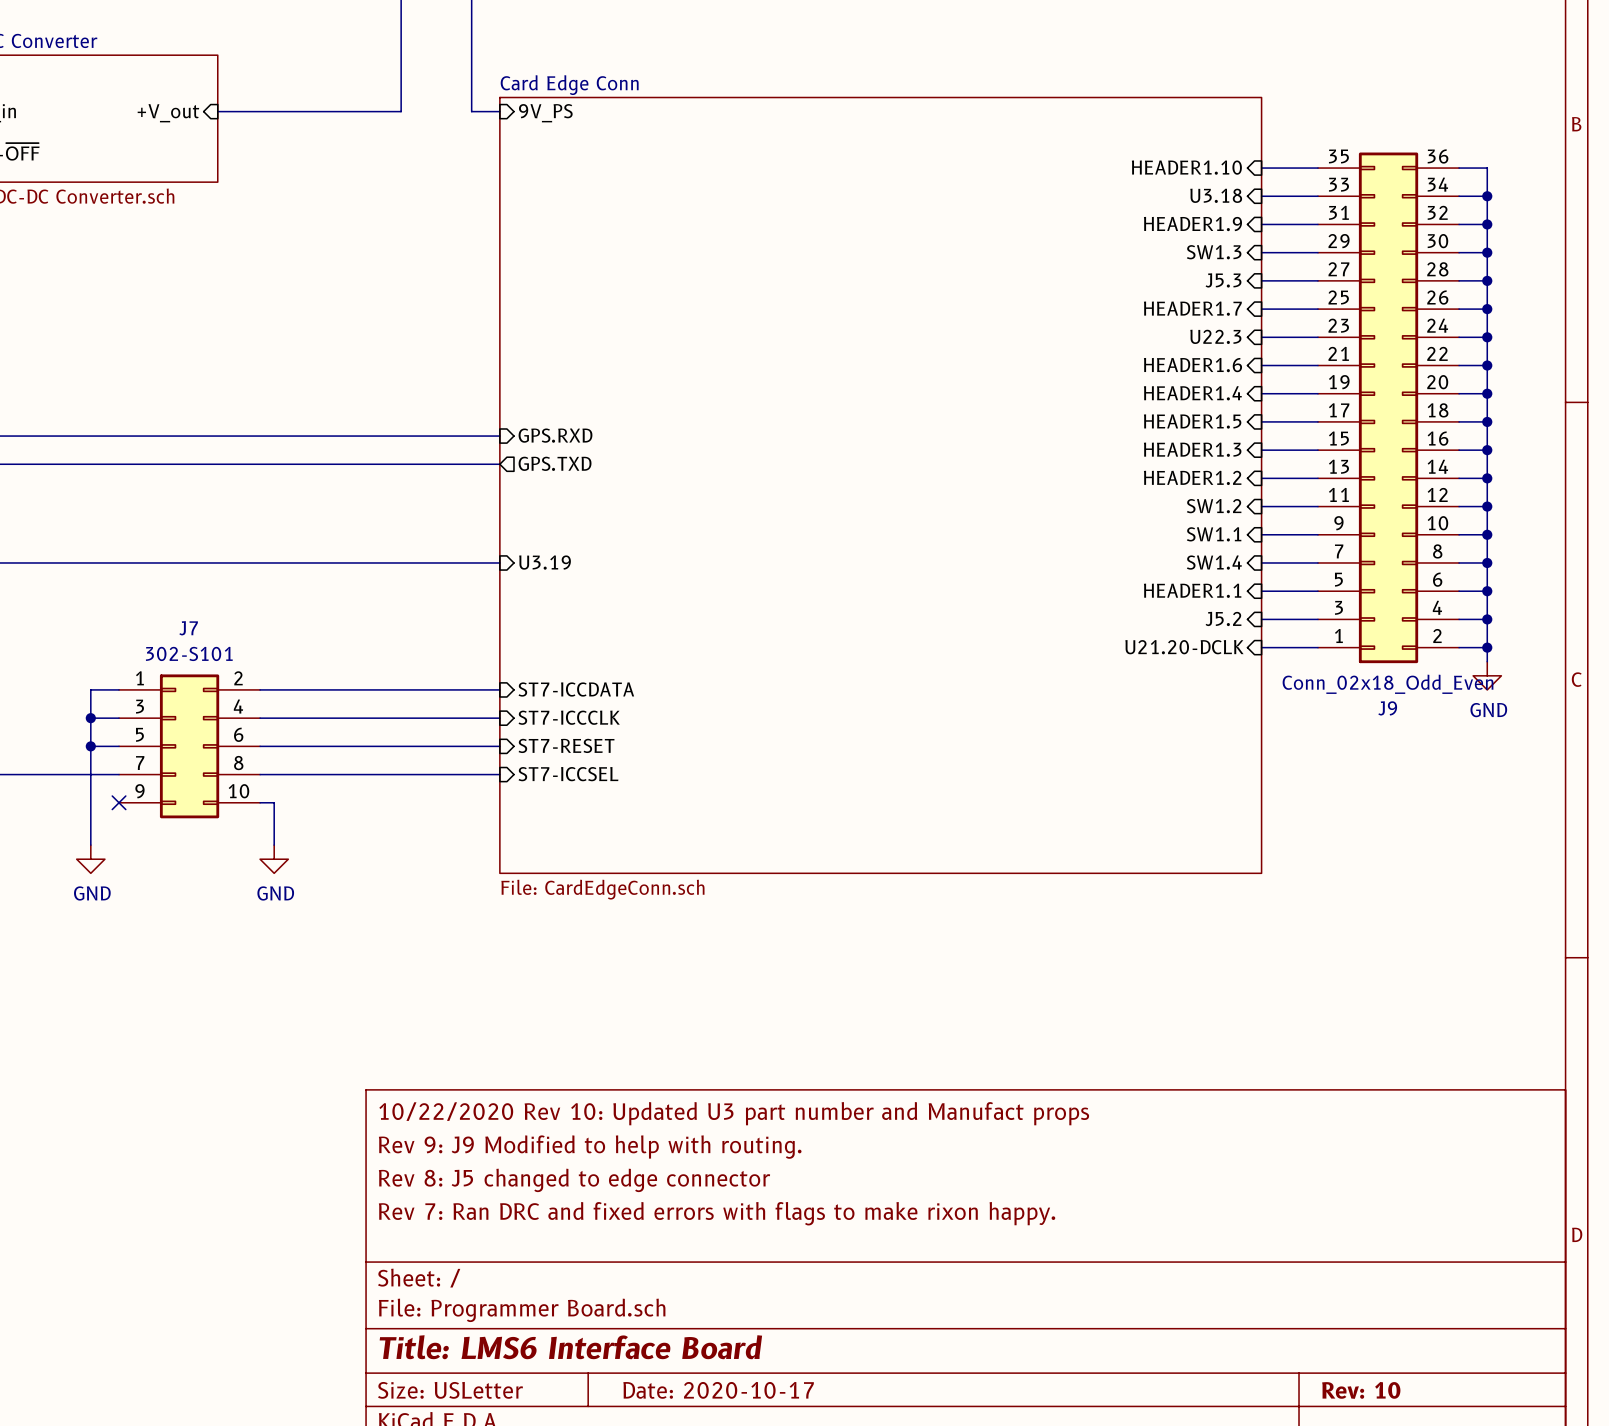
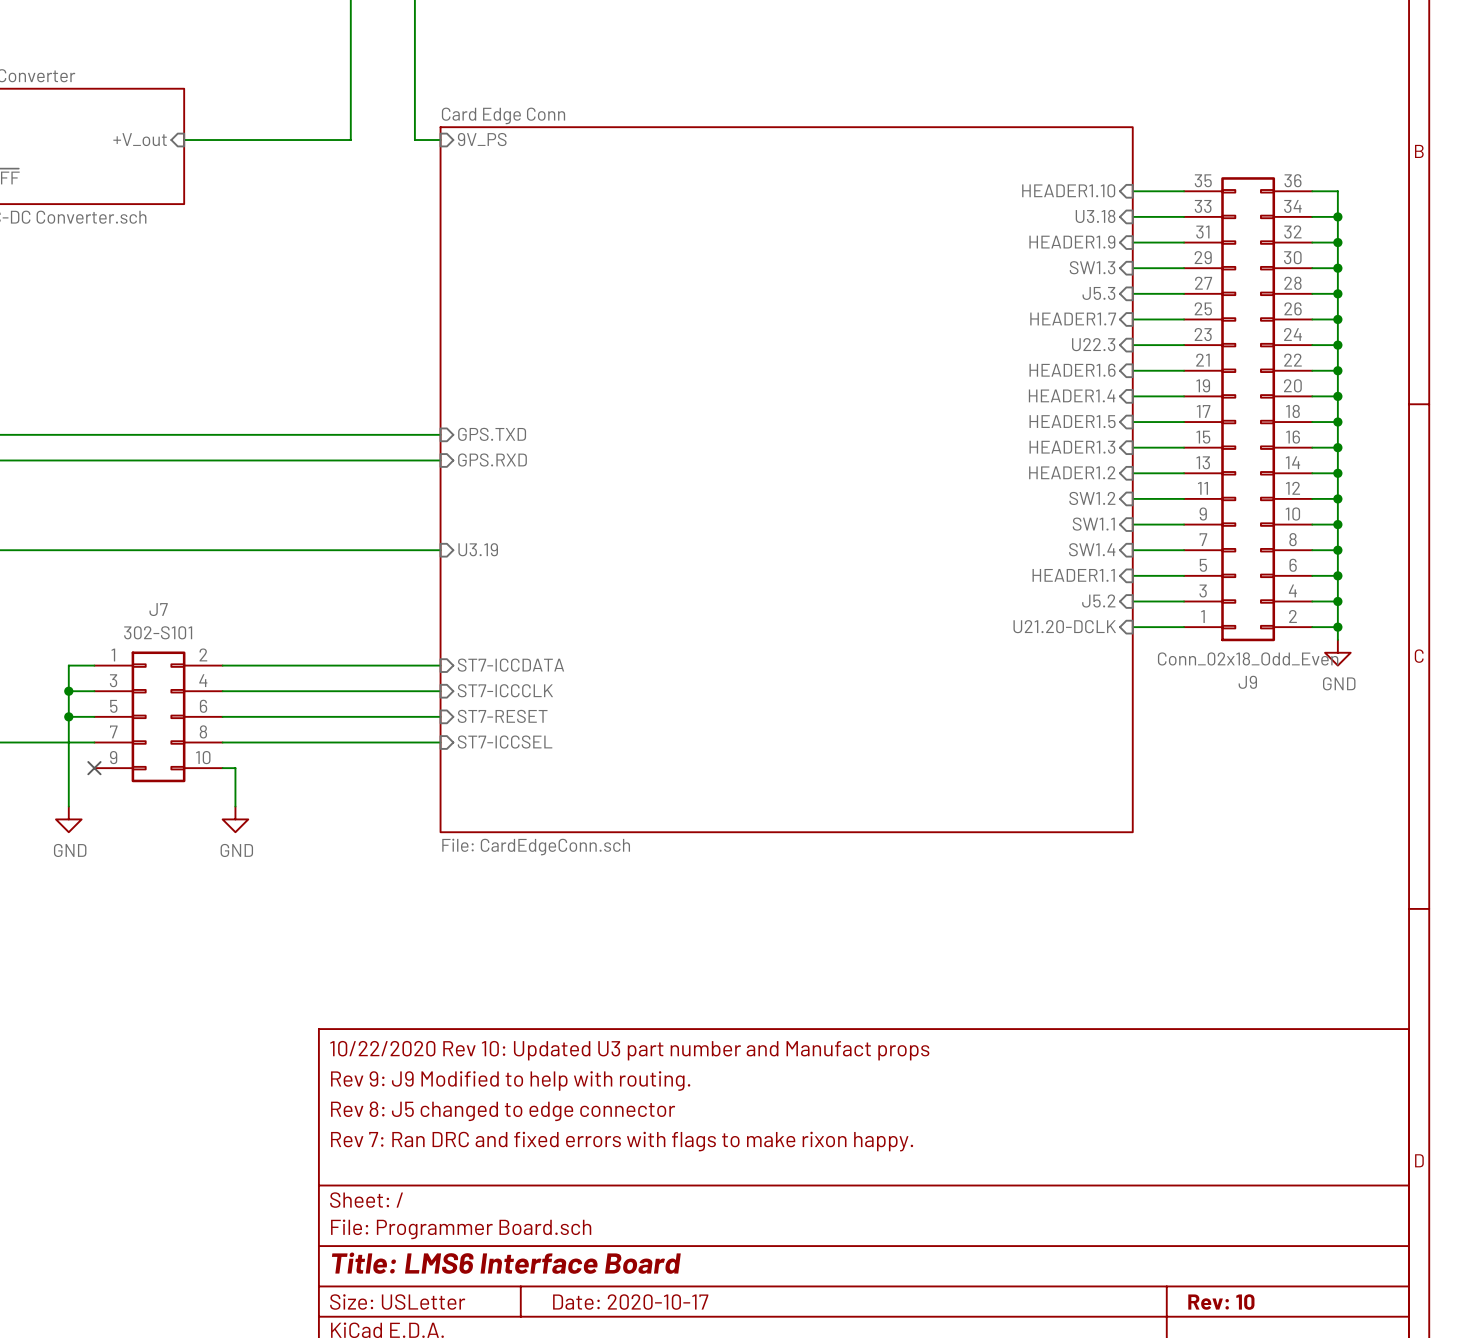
sheet pin: GPS.RXD (555, 435) -> GPS.TXD (492, 434)
sheet pin shape: output (555, 463) -> input (492, 460)
sheet pin: GPS.TXD (555, 463) -> GPS.RXD (492, 460)

